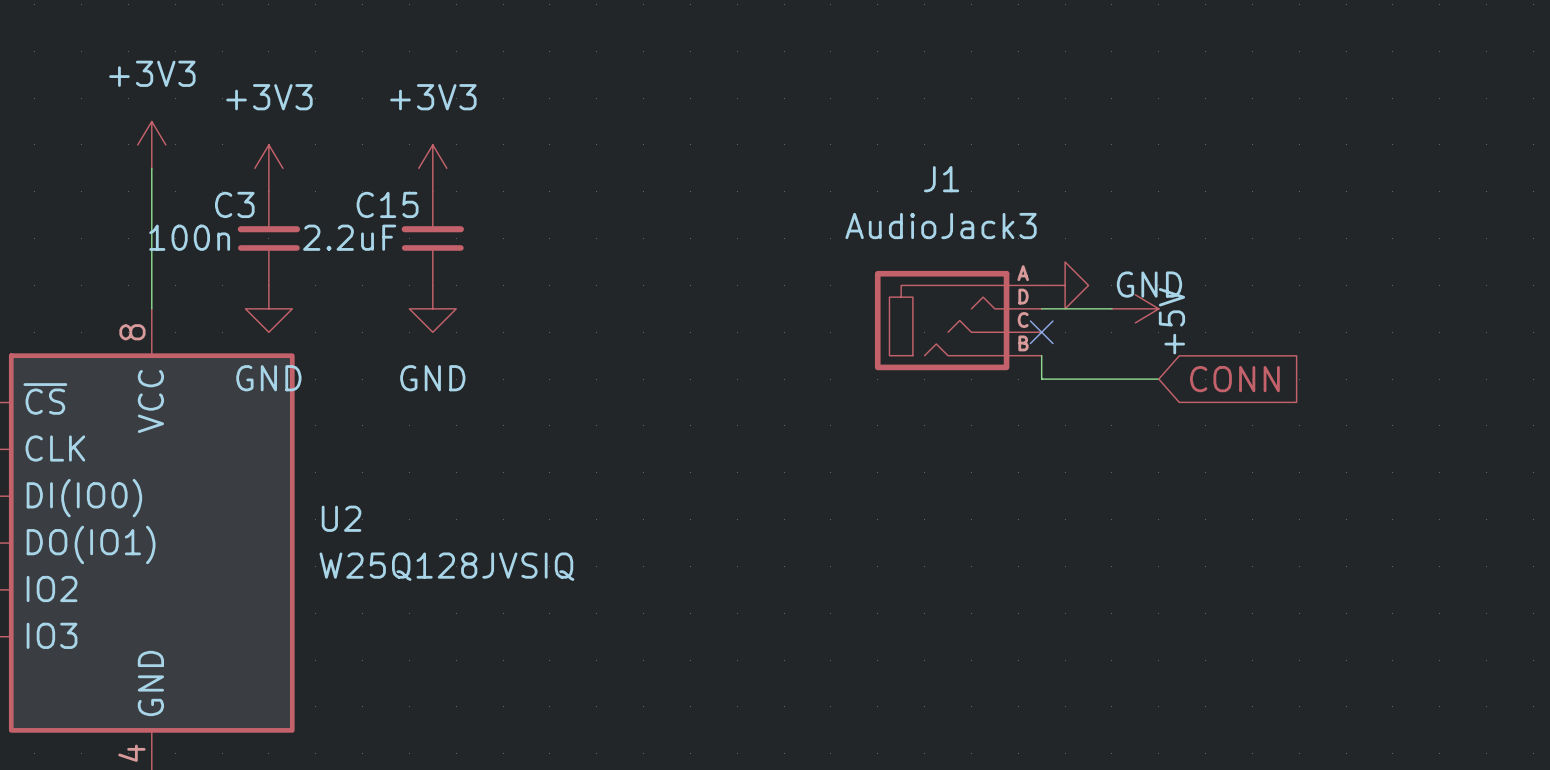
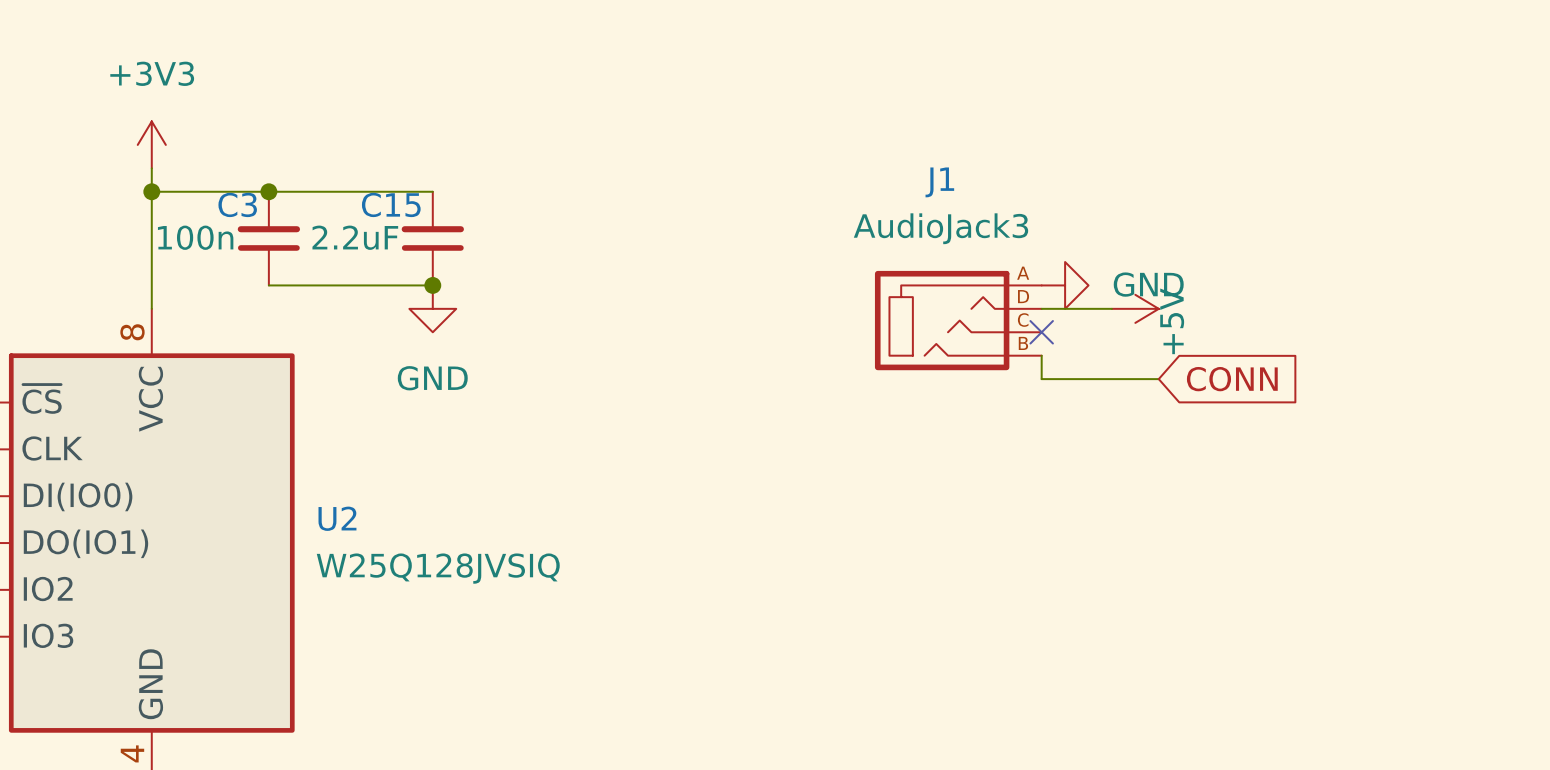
power symbol: +3V3 (268, 168) -> none
power symbol: +3V3 (432, 168) -> none
wire: none -> (151, 191) (432, 191)
junction: none -> (151, 191)
junction: none -> (268, 191)
wire: none -> (268, 285) (432, 285)
junction: none -> (432, 285)
power symbol: GND (268, 308) -> none

